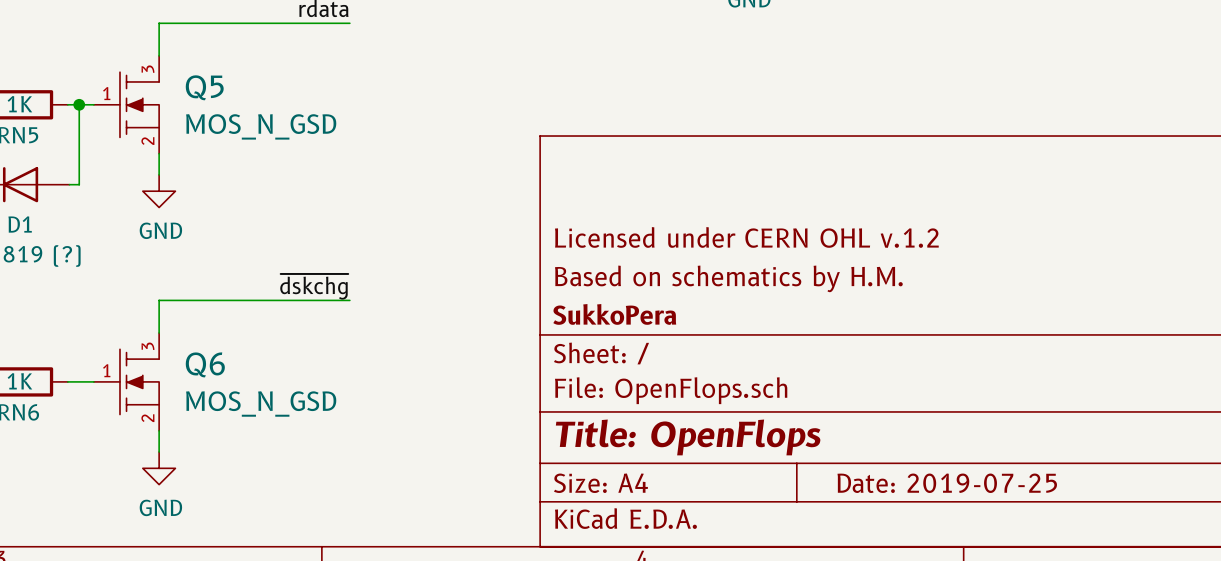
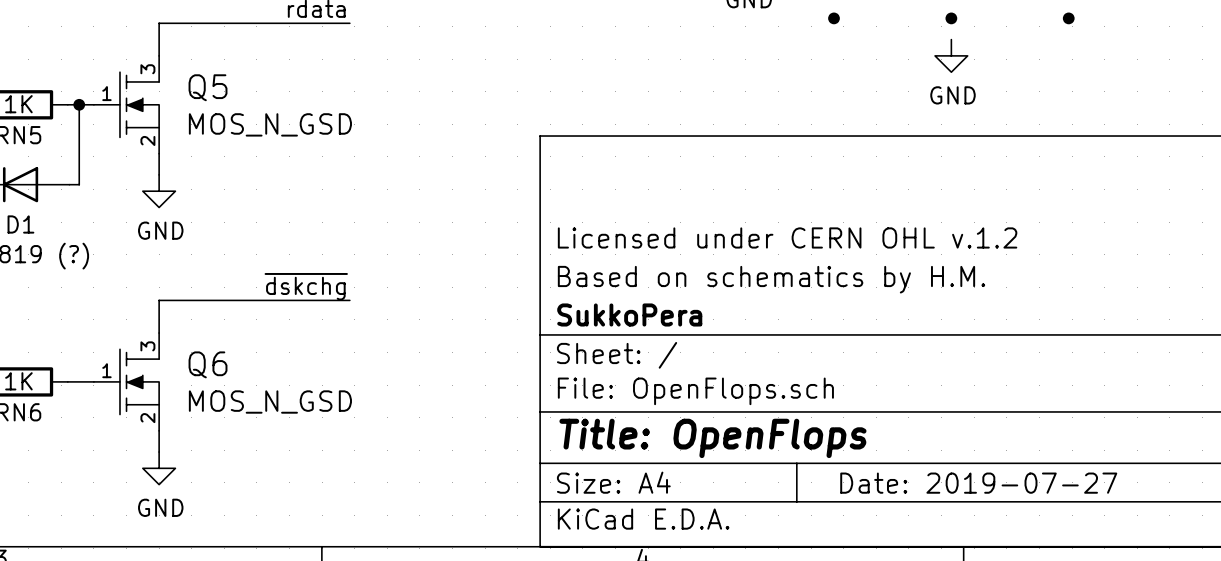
junction: none -> (834, 18)
junction: none -> (951, 18)
junction: none -> (1068, 18)
power symbol: none -> GND (951, 55)
title block: Date: 2019-07-25 (947, 483) -> Date: 2019-07-27 (978, 483)

